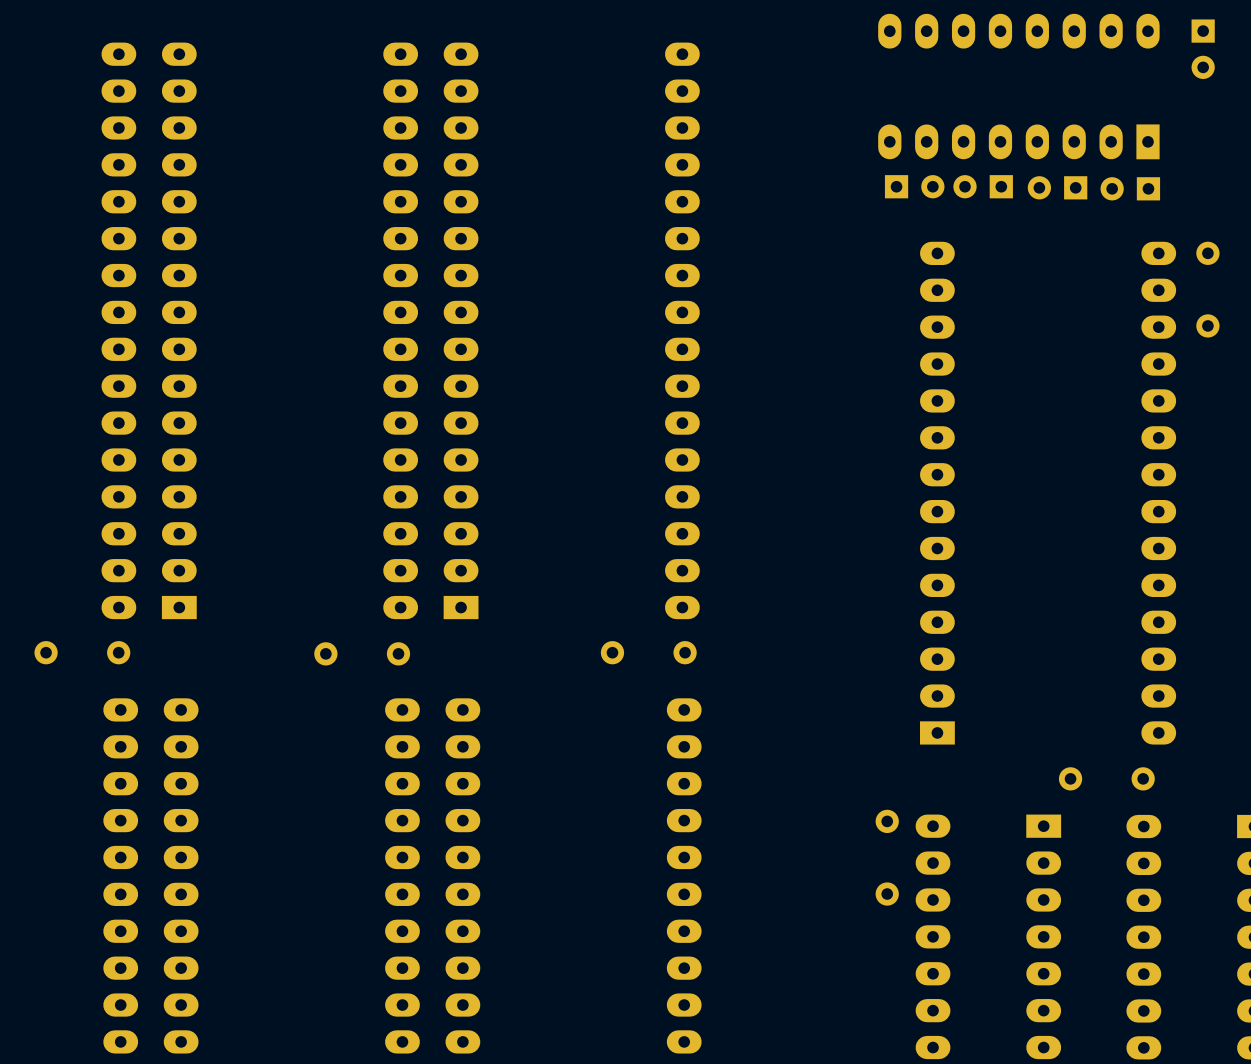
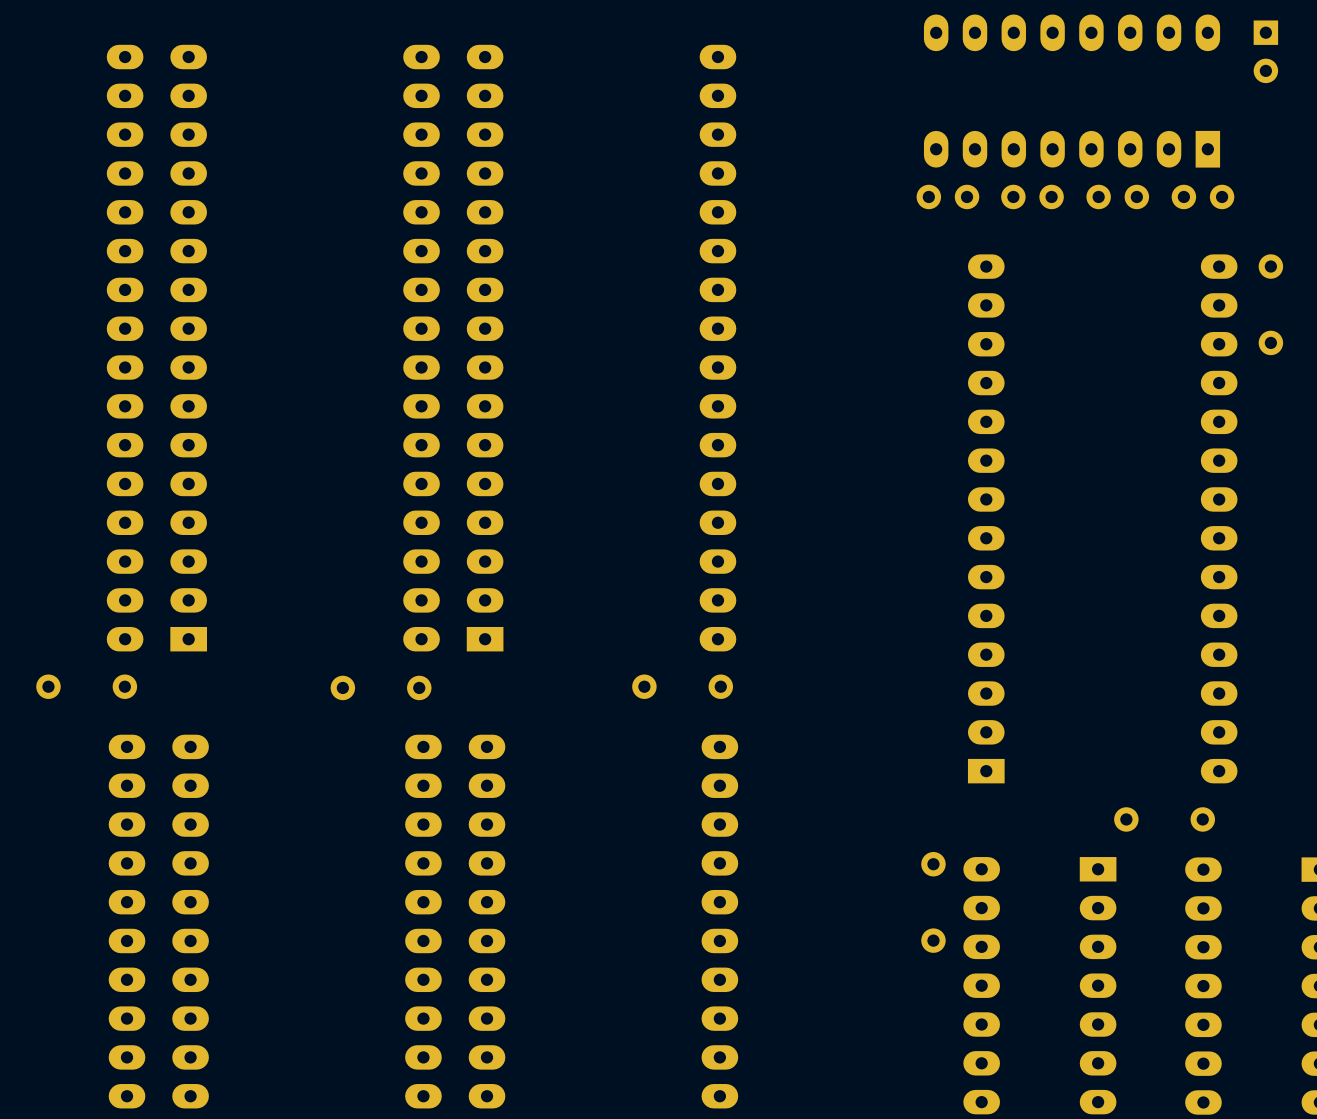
part footprint: [884, 175, 945, 199] -> [916, 184, 980, 210]
part footprint: [953, 175, 1013, 199] -> [1001, 184, 1064, 210]
part footprint: [1027, 176, 1088, 200] -> [1086, 184, 1150, 210]
part footprint: [1100, 177, 1161, 201] -> [1171, 184, 1235, 210]

